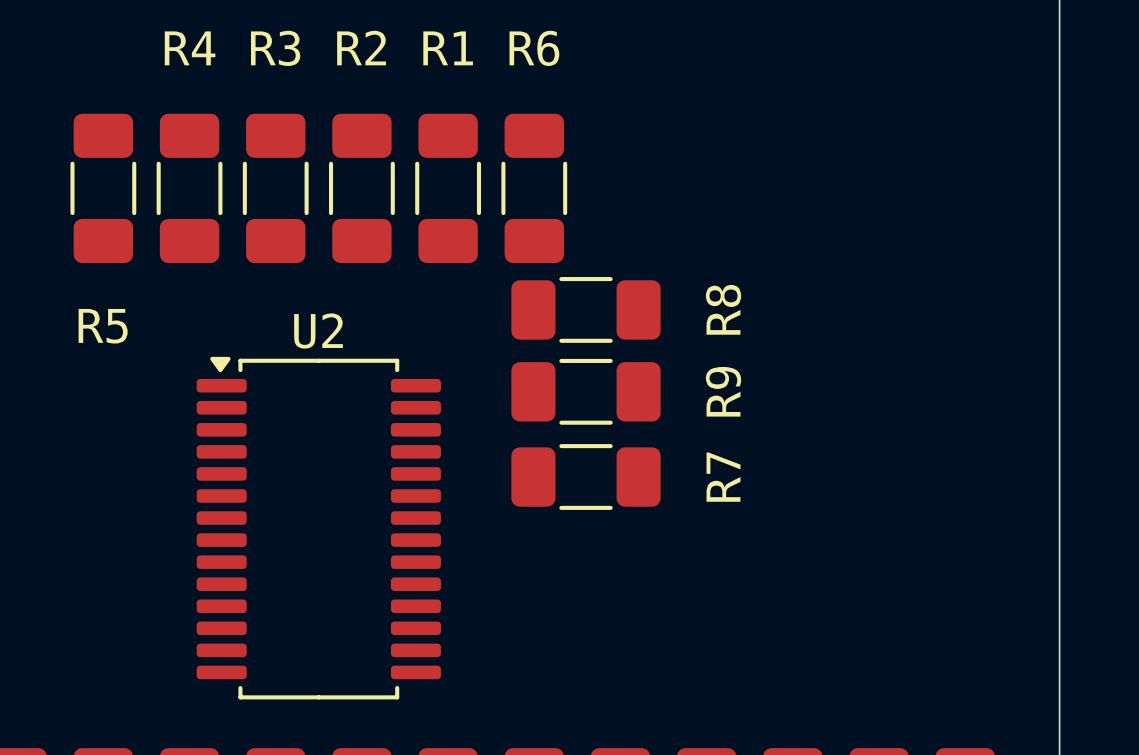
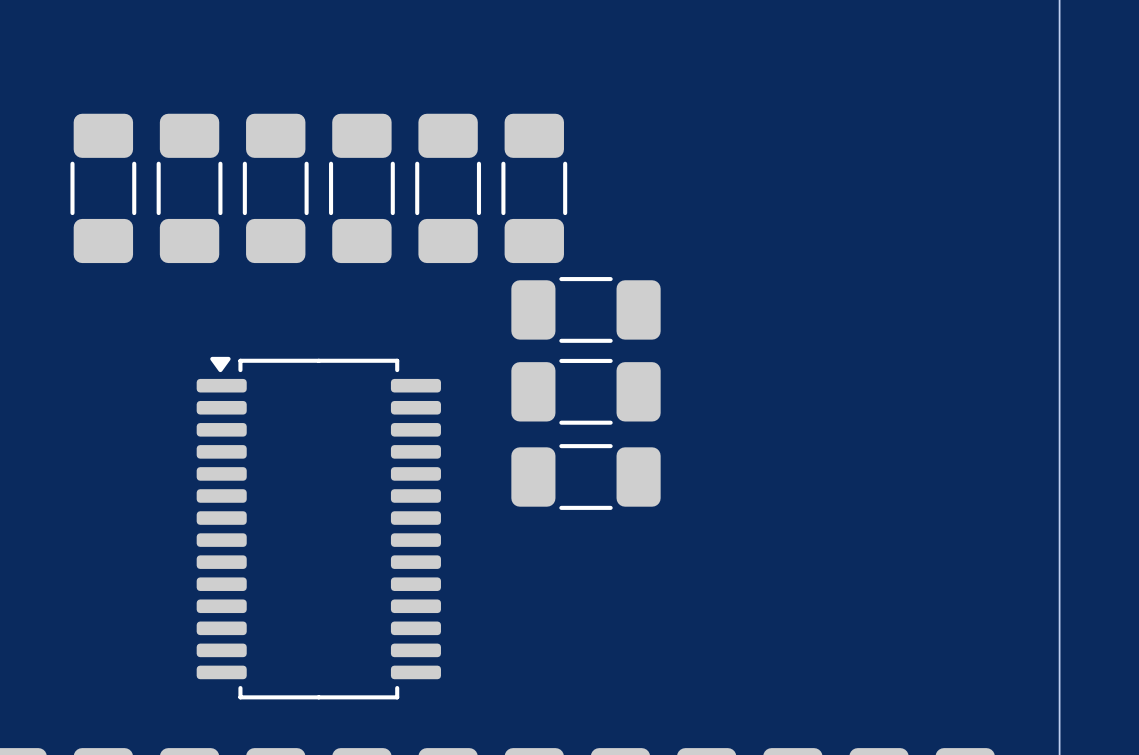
R4 name: R4 (190, 48) -> none
R3 name: R3 (275, 48) -> none
R2 name: R2 (361, 48) -> none
R1 name: R1 (448, 48) -> none
R6 name: R6 (534, 48) -> none
R8 name: R8 (723, 309) -> none
R5 name: R5 (103, 326) -> none
U2 name: U2 (318, 331) -> none
R9 name: R9 (723, 391) -> none
R7 name: R7 (723, 477) -> none

